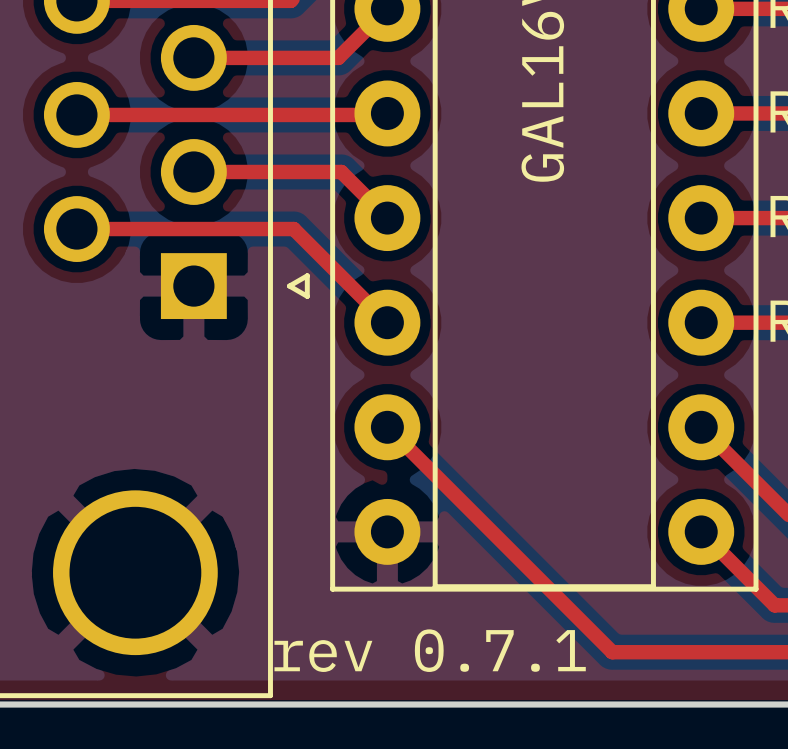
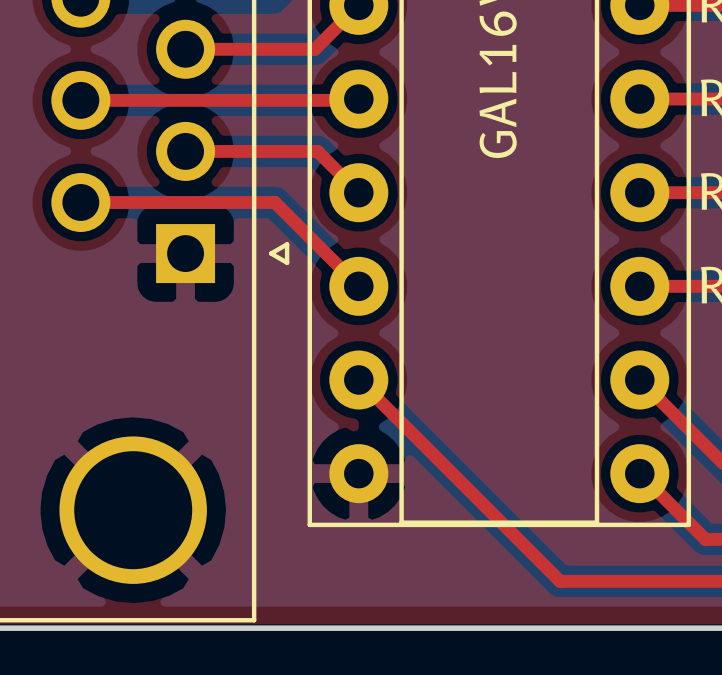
text: rev 0.7.1 (430, 650) -> none

